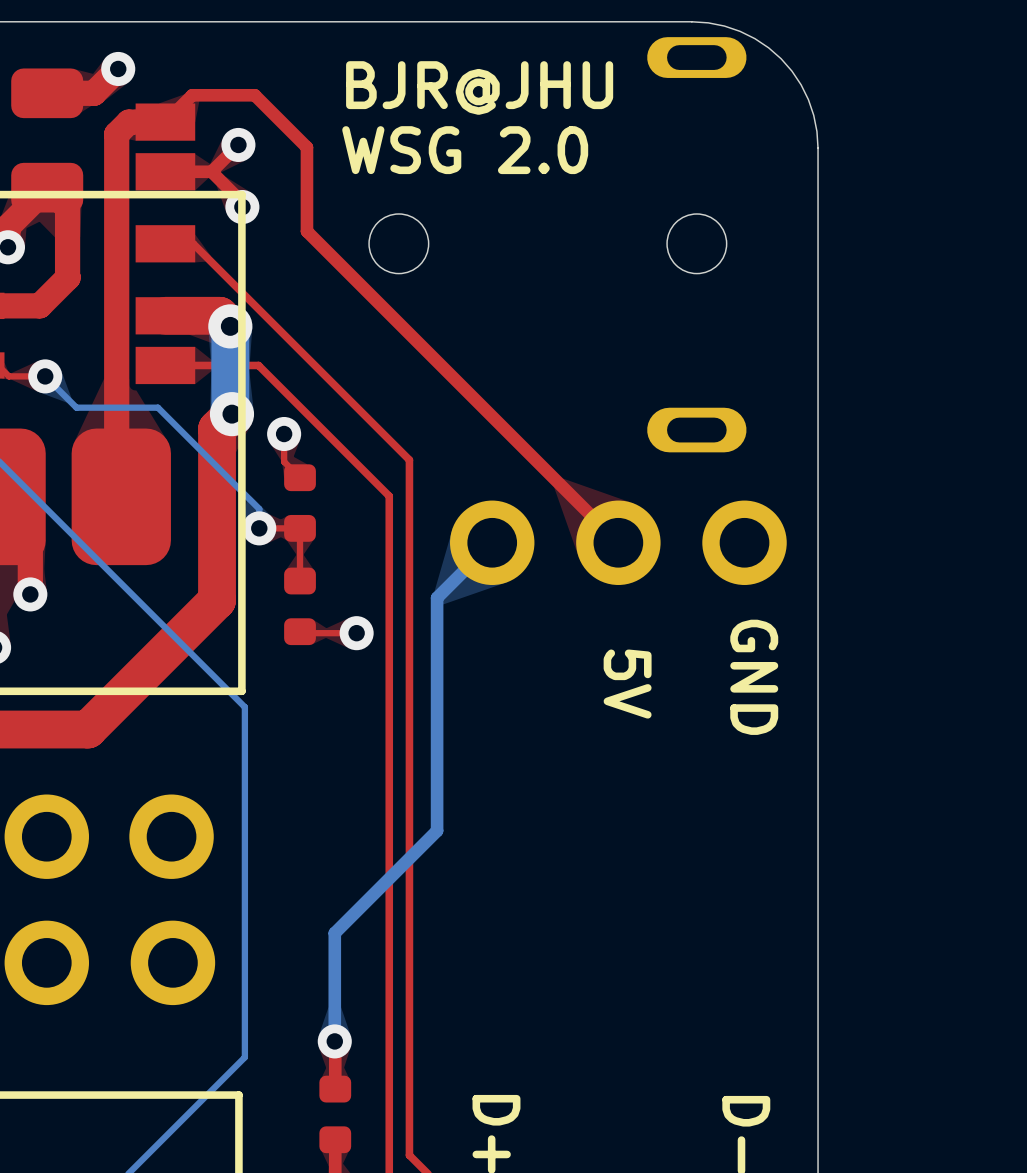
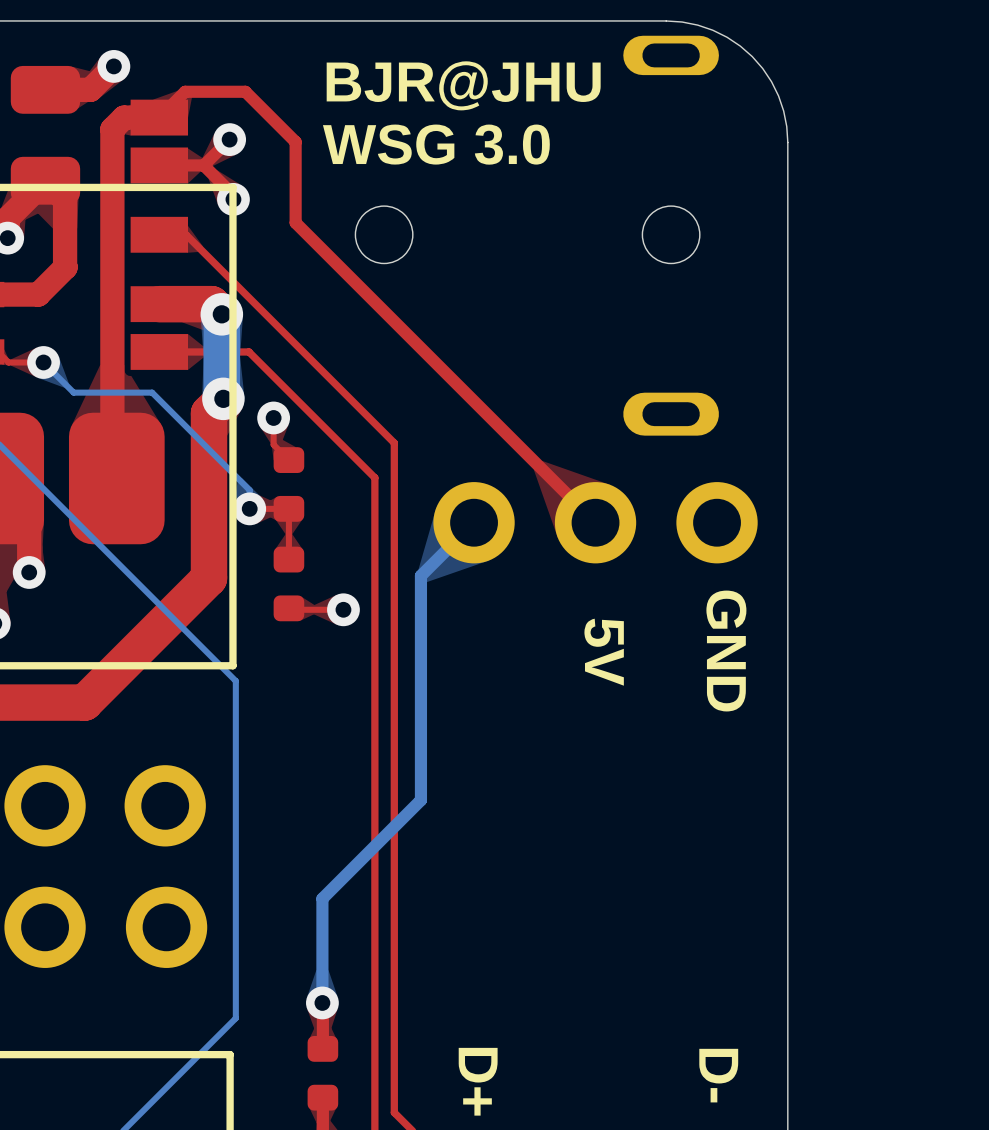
text: WSG 2.0 (465, 150) -> WSG 3.0 (436, 144)

